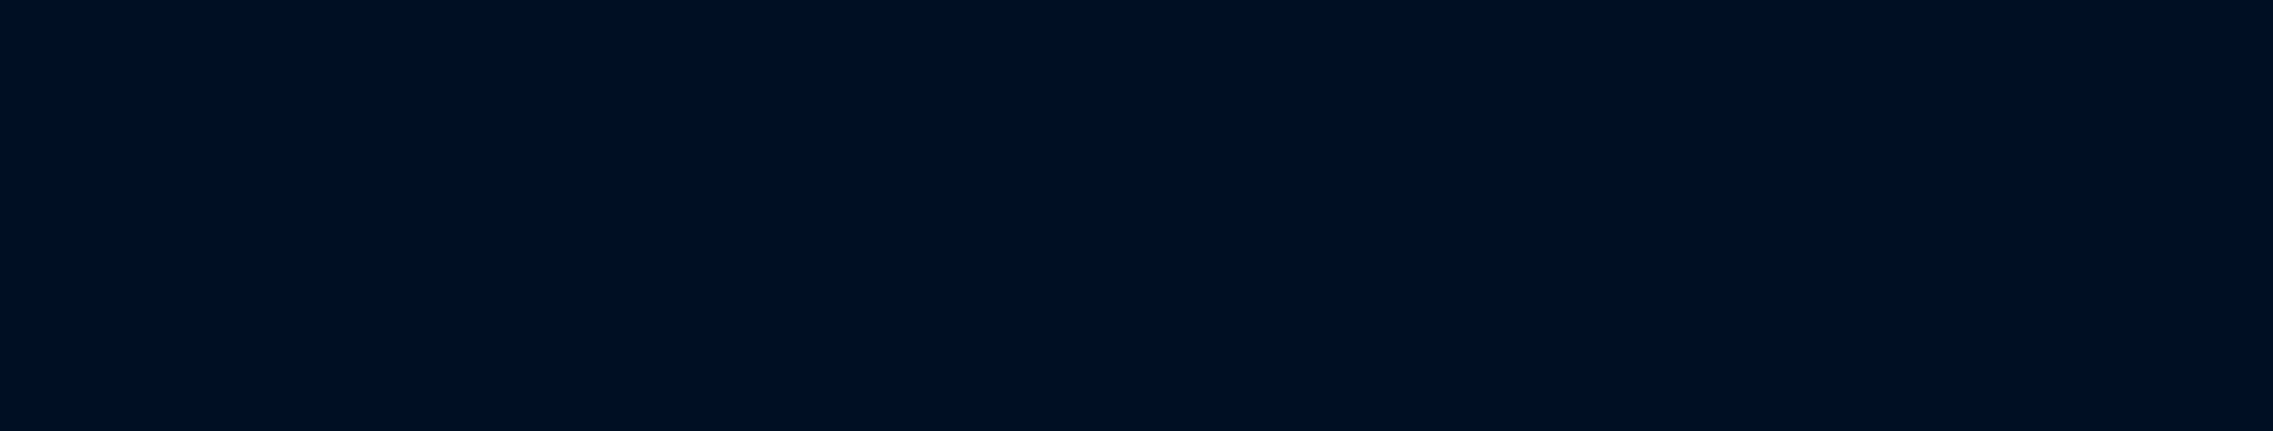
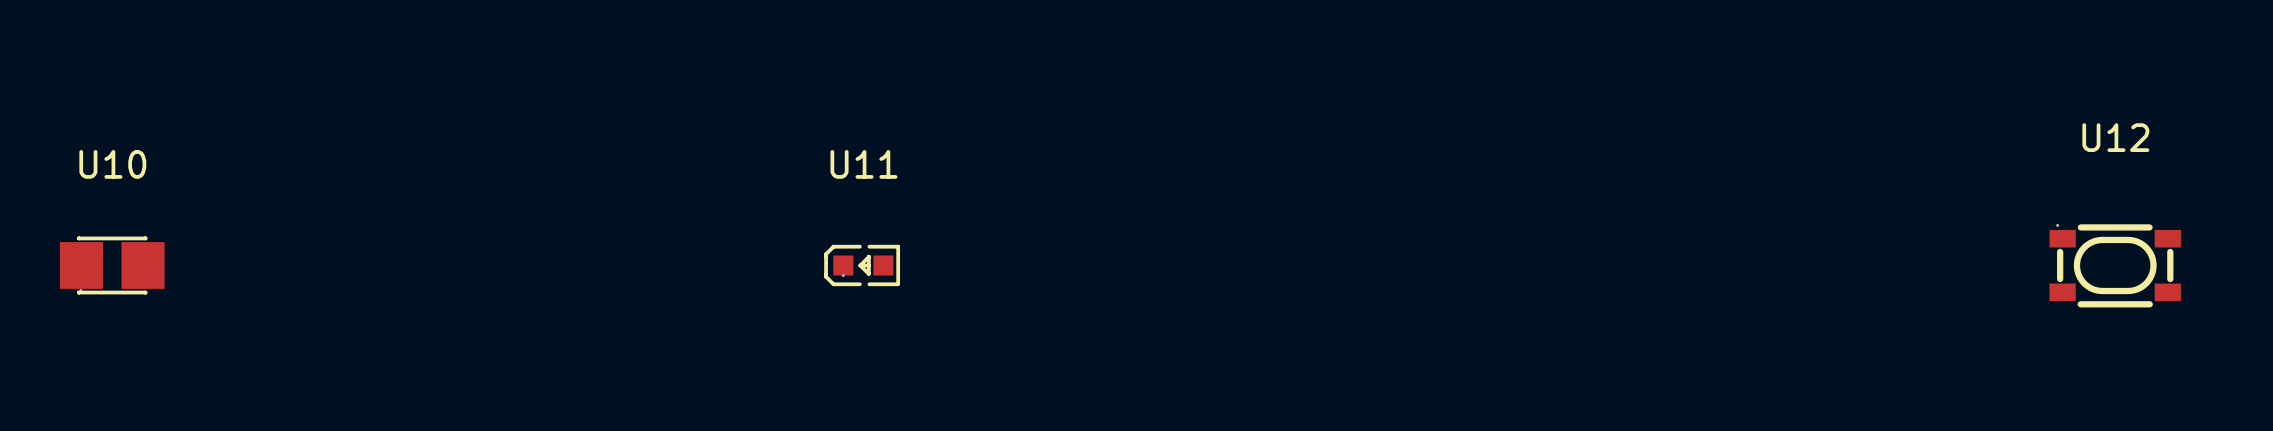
U10: none -> (112, 265)
U11: none -> (862, 265)
U12: none -> (2115, 265)

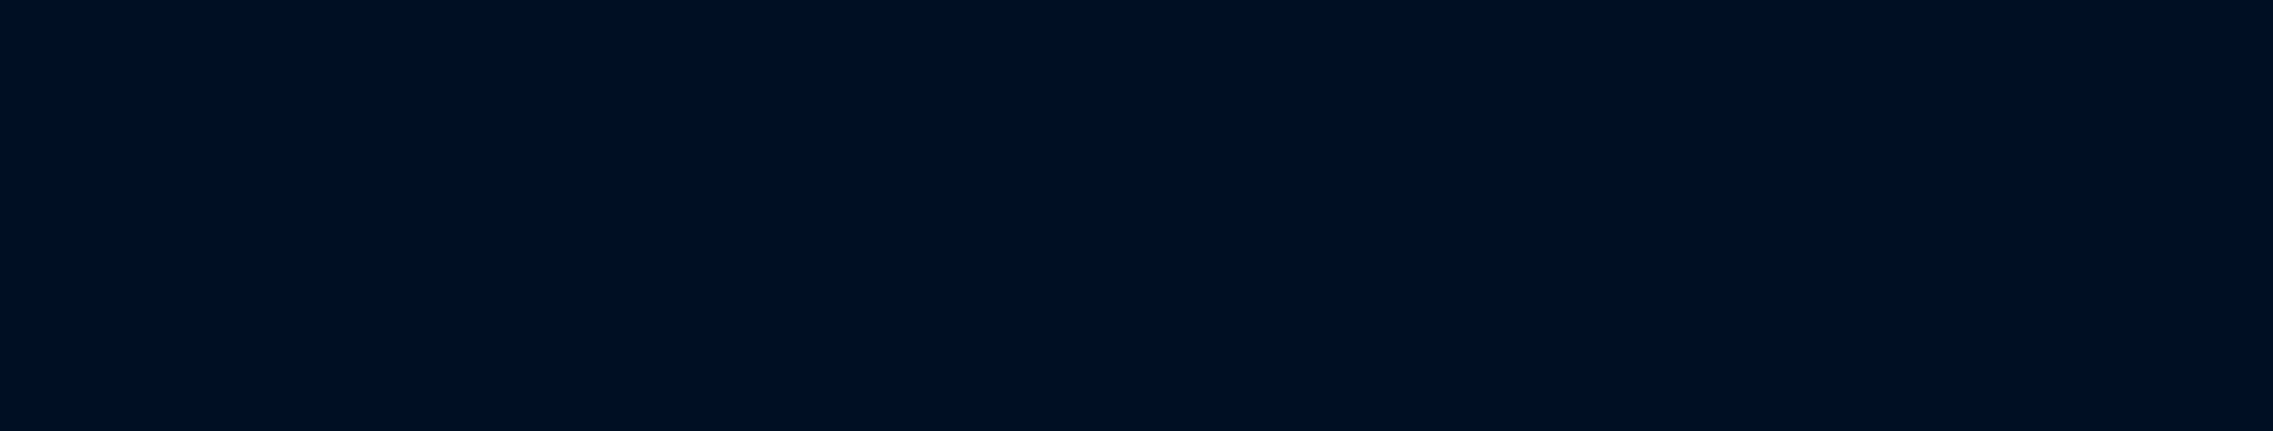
U10: (112, 265) -> none
U11: (862, 265) -> none
U12: (2115, 265) -> none

